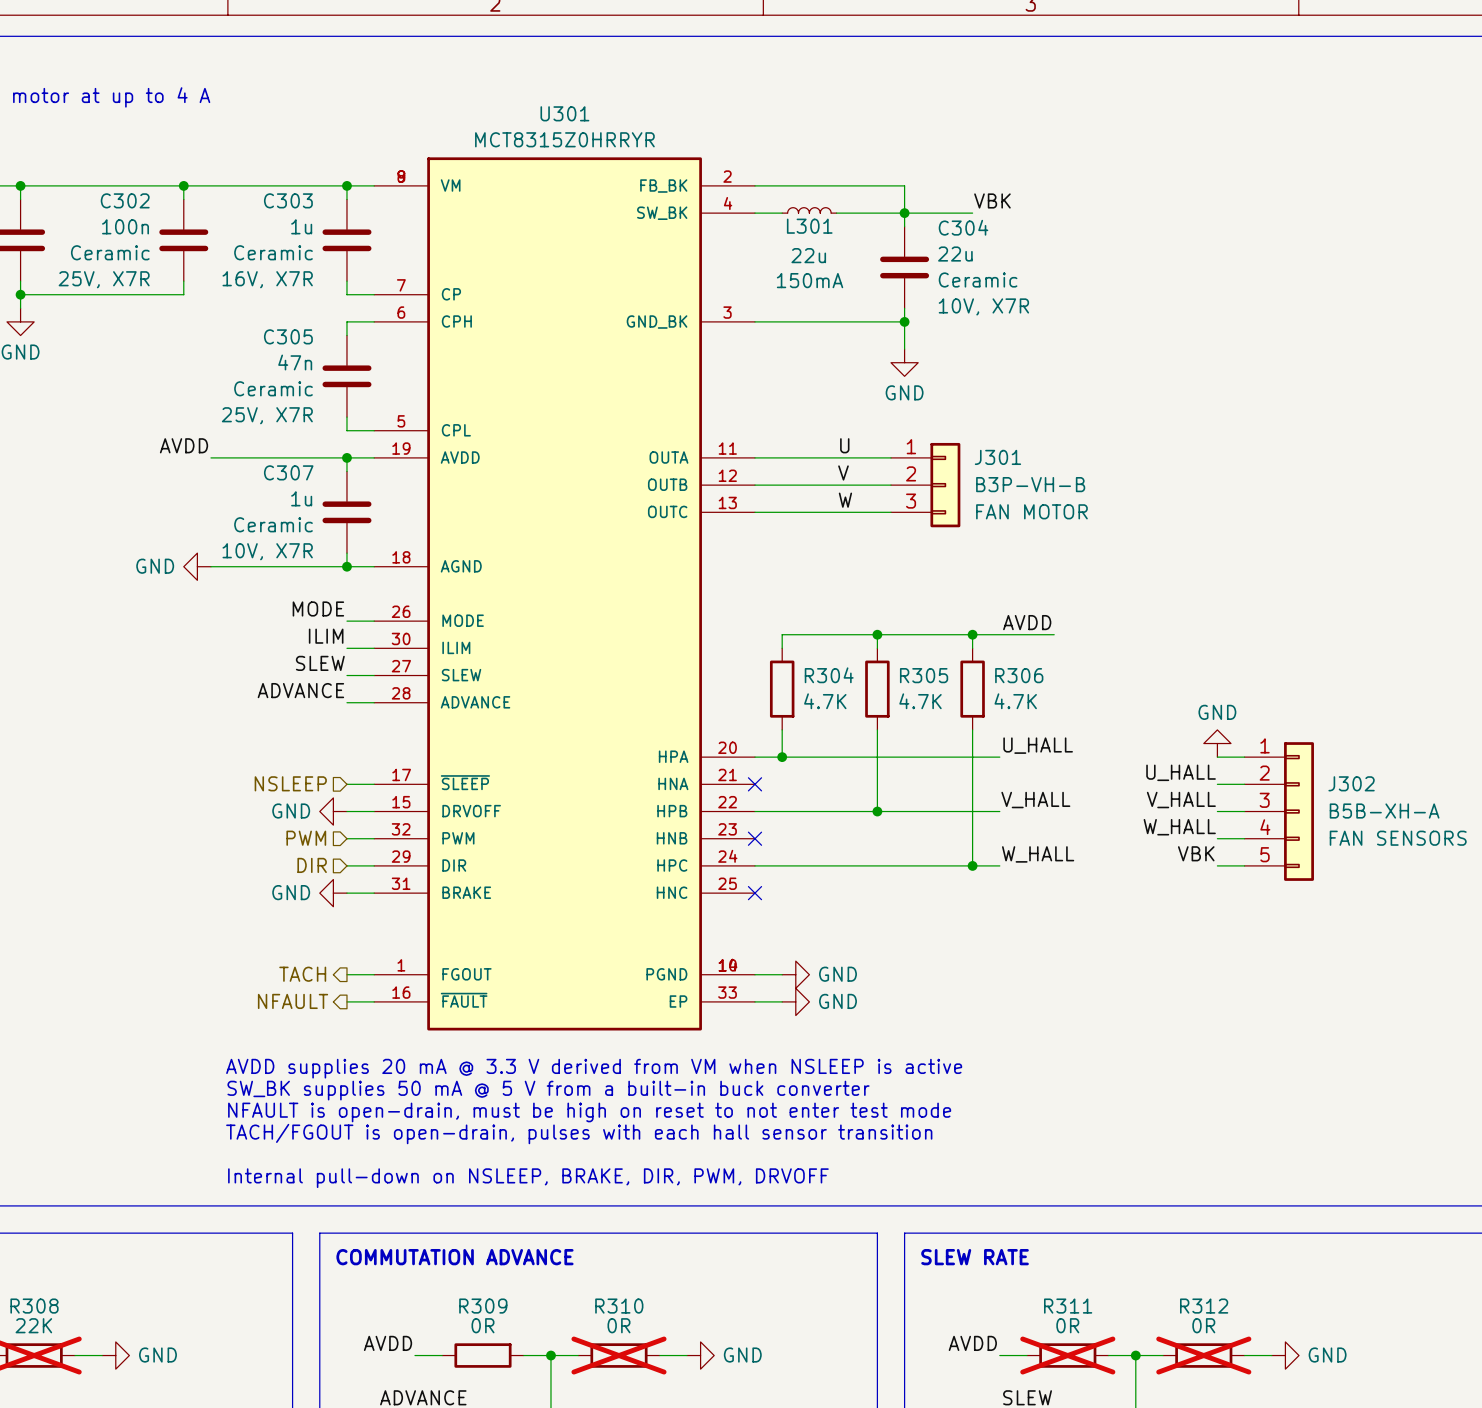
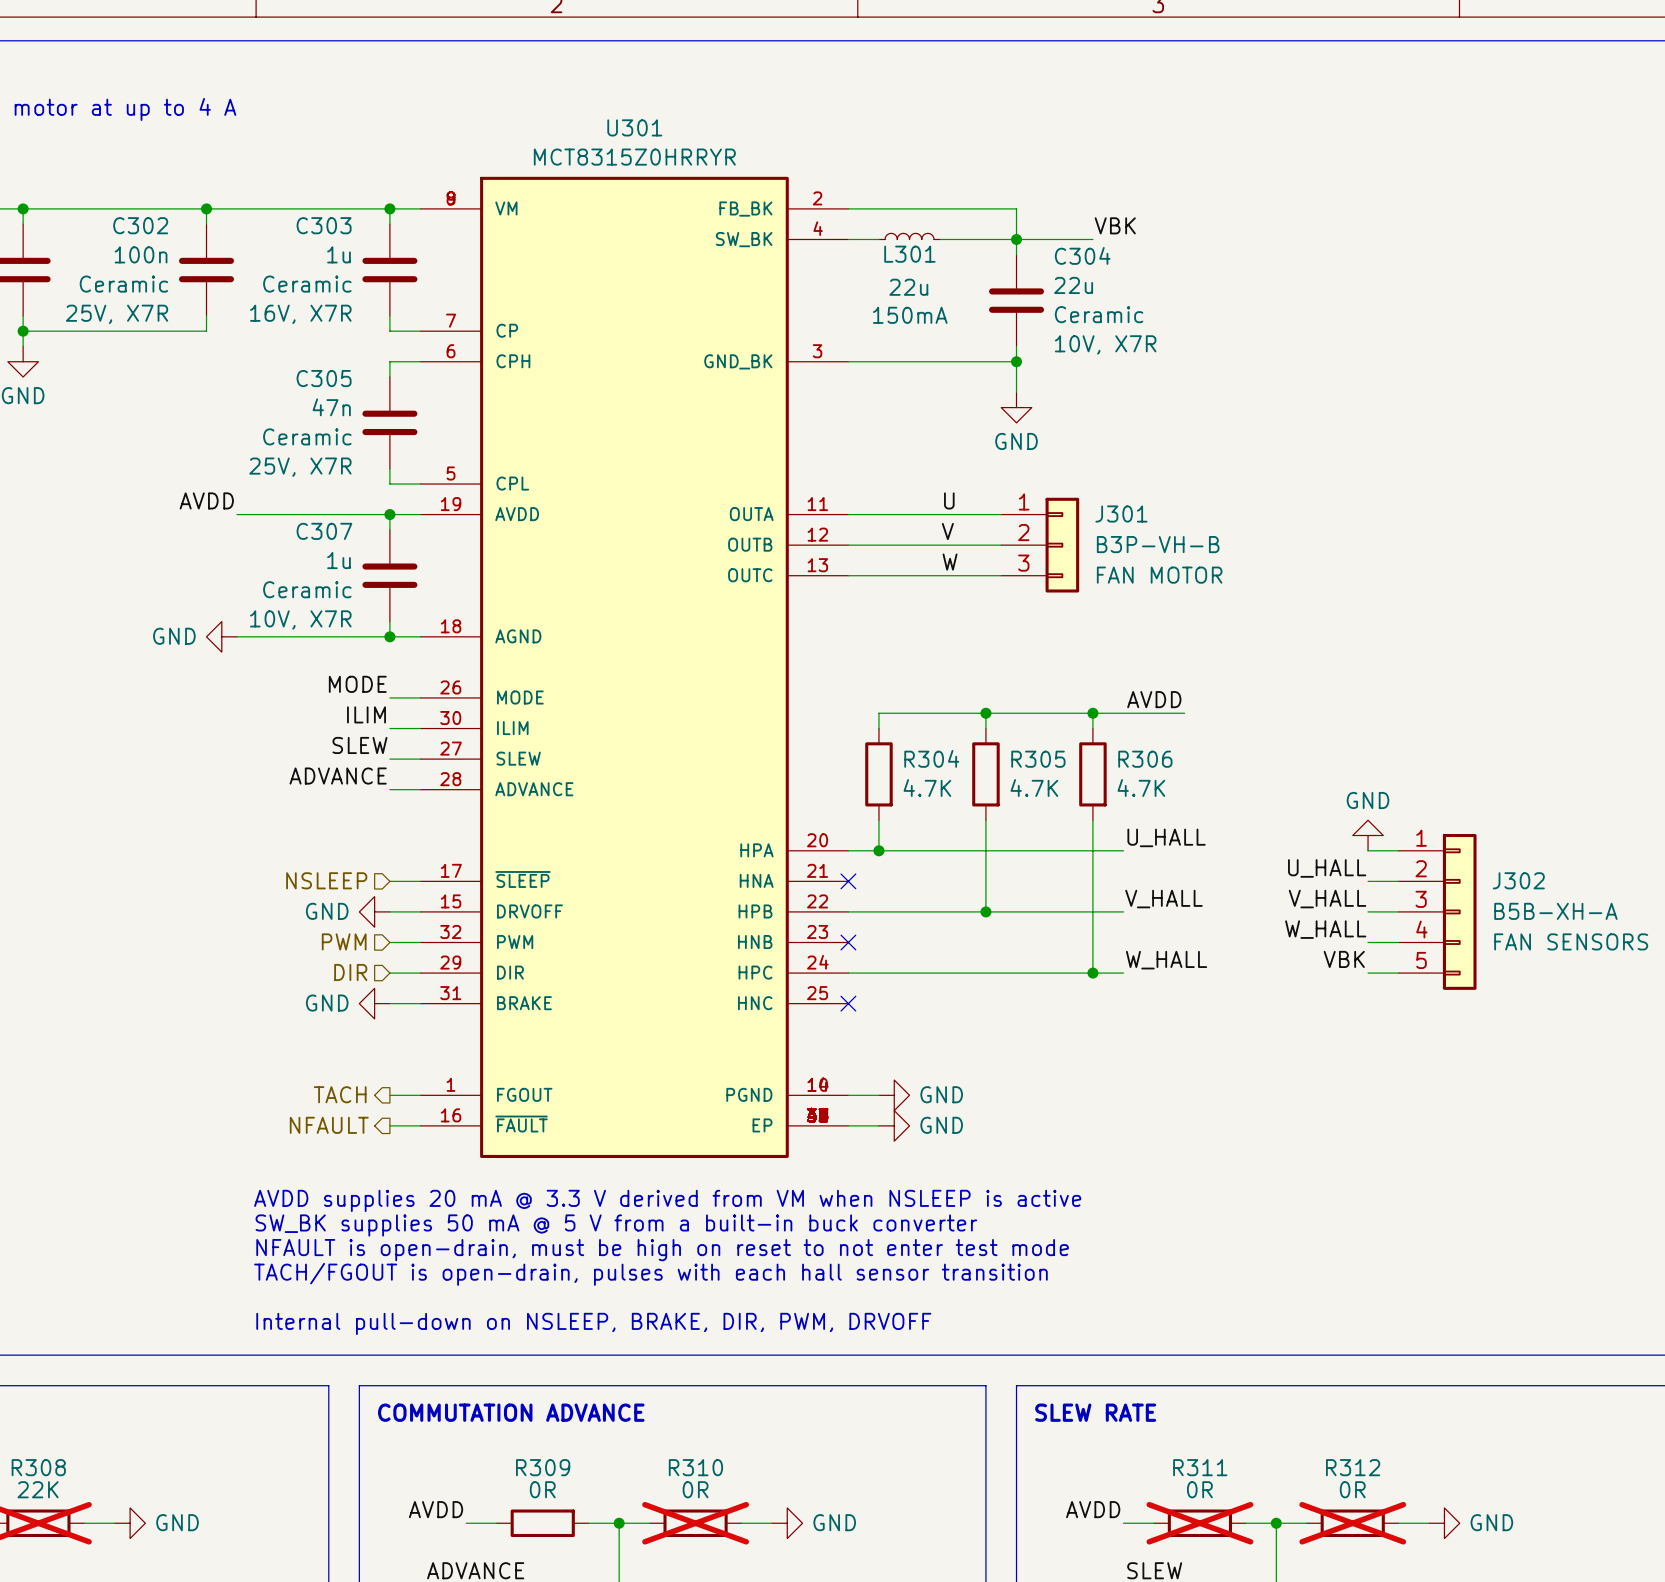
U301 symbol: [374, 157, 755, 1031] -> [420, 176, 849, 1158]

